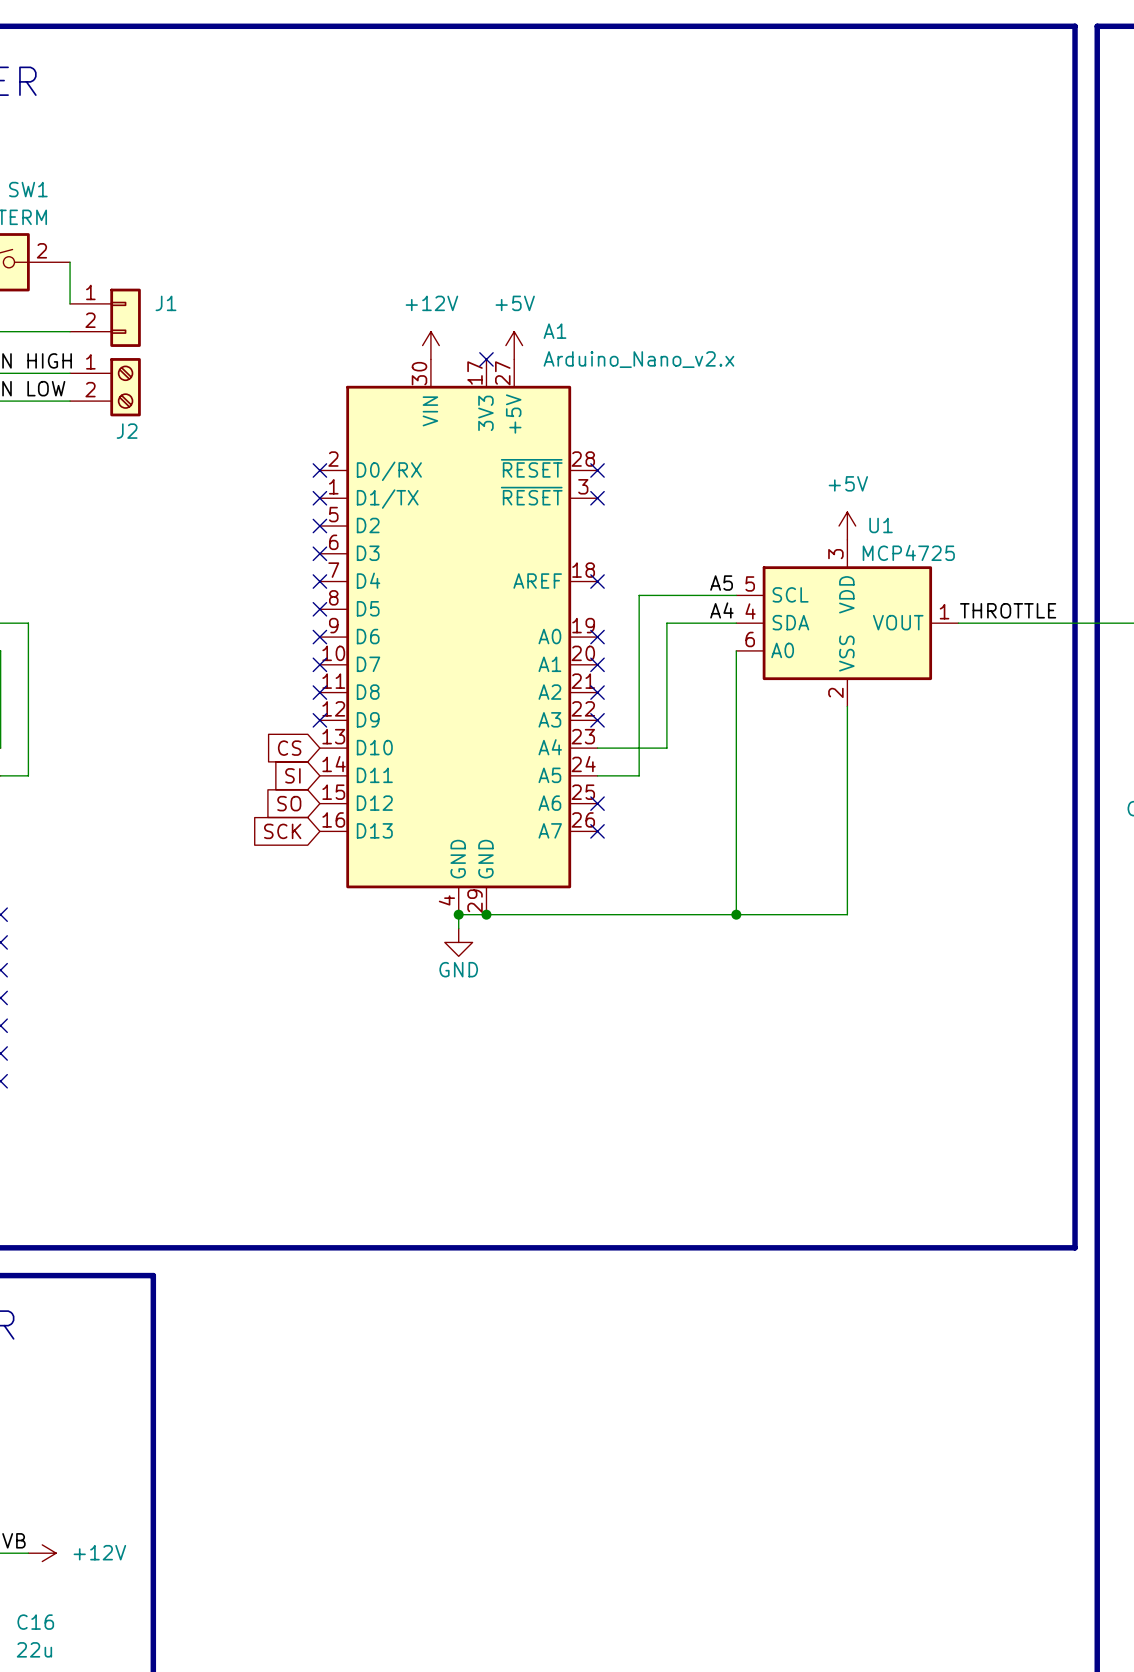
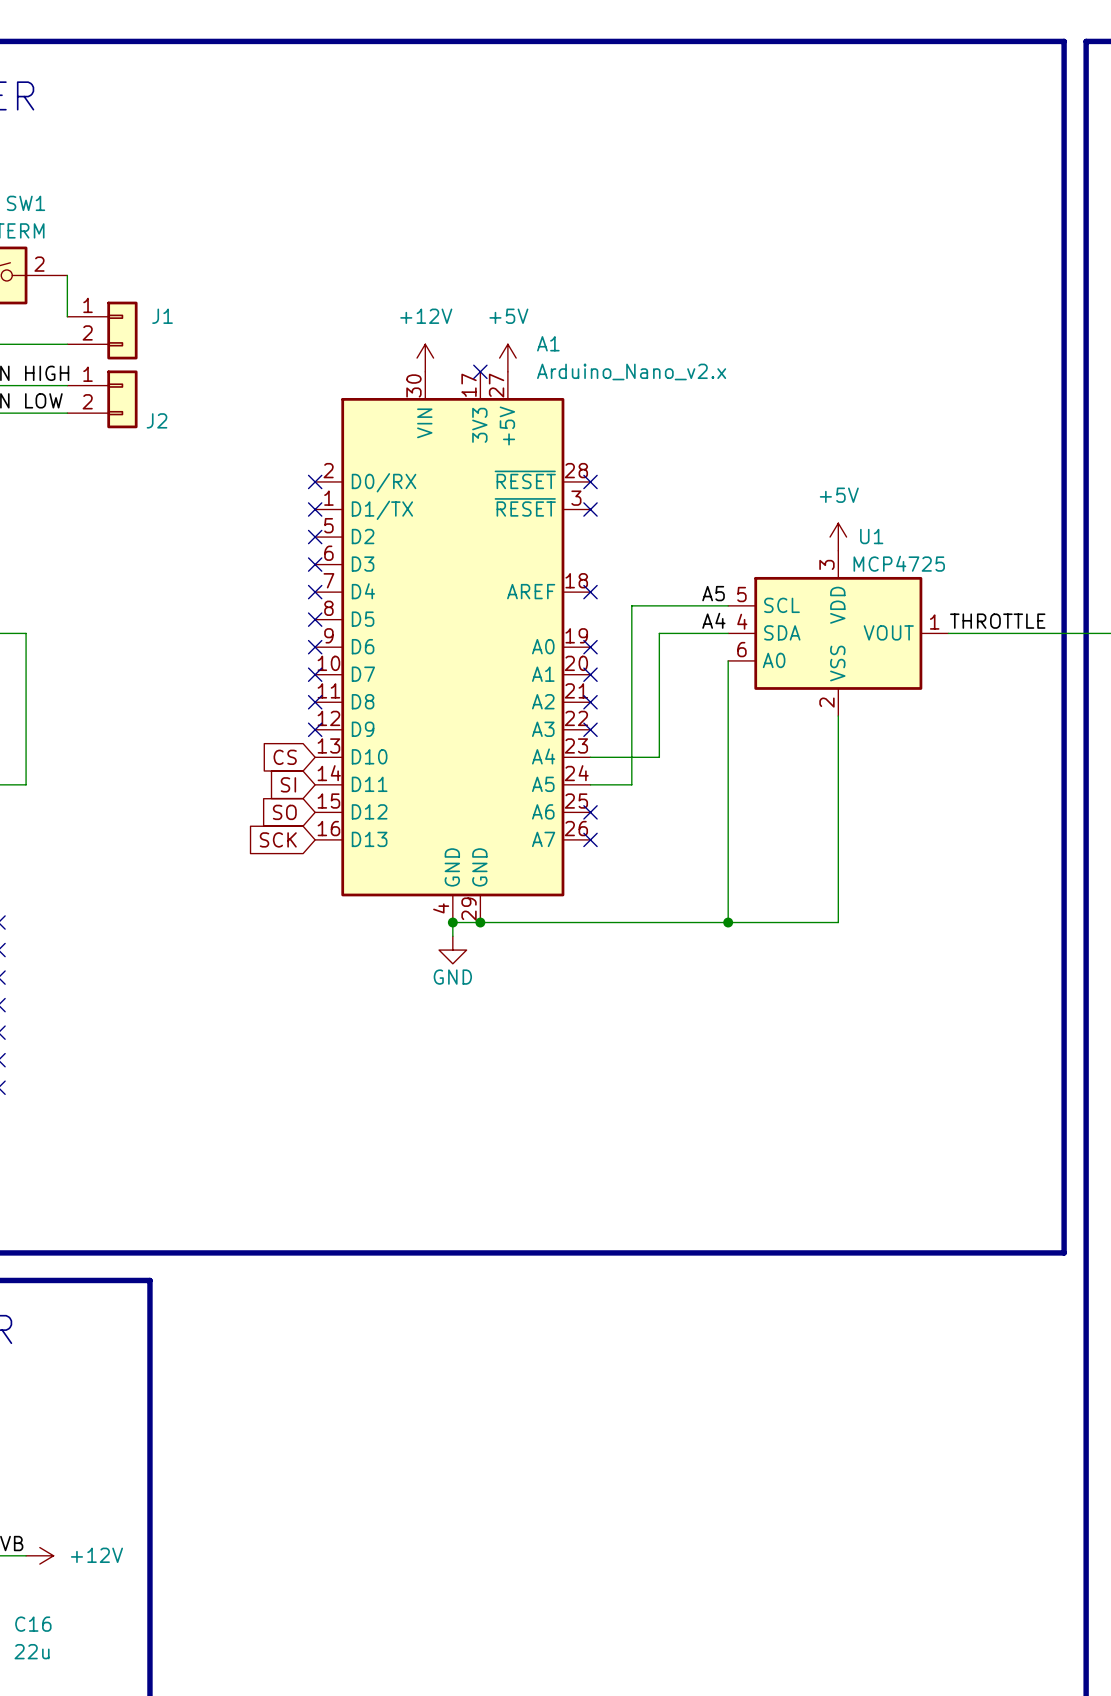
J2 symbol: [70, 358, 141, 417] -> [67, 370, 138, 429]
J2 name position: J2 (127, 431) -> J2 (157, 420)

